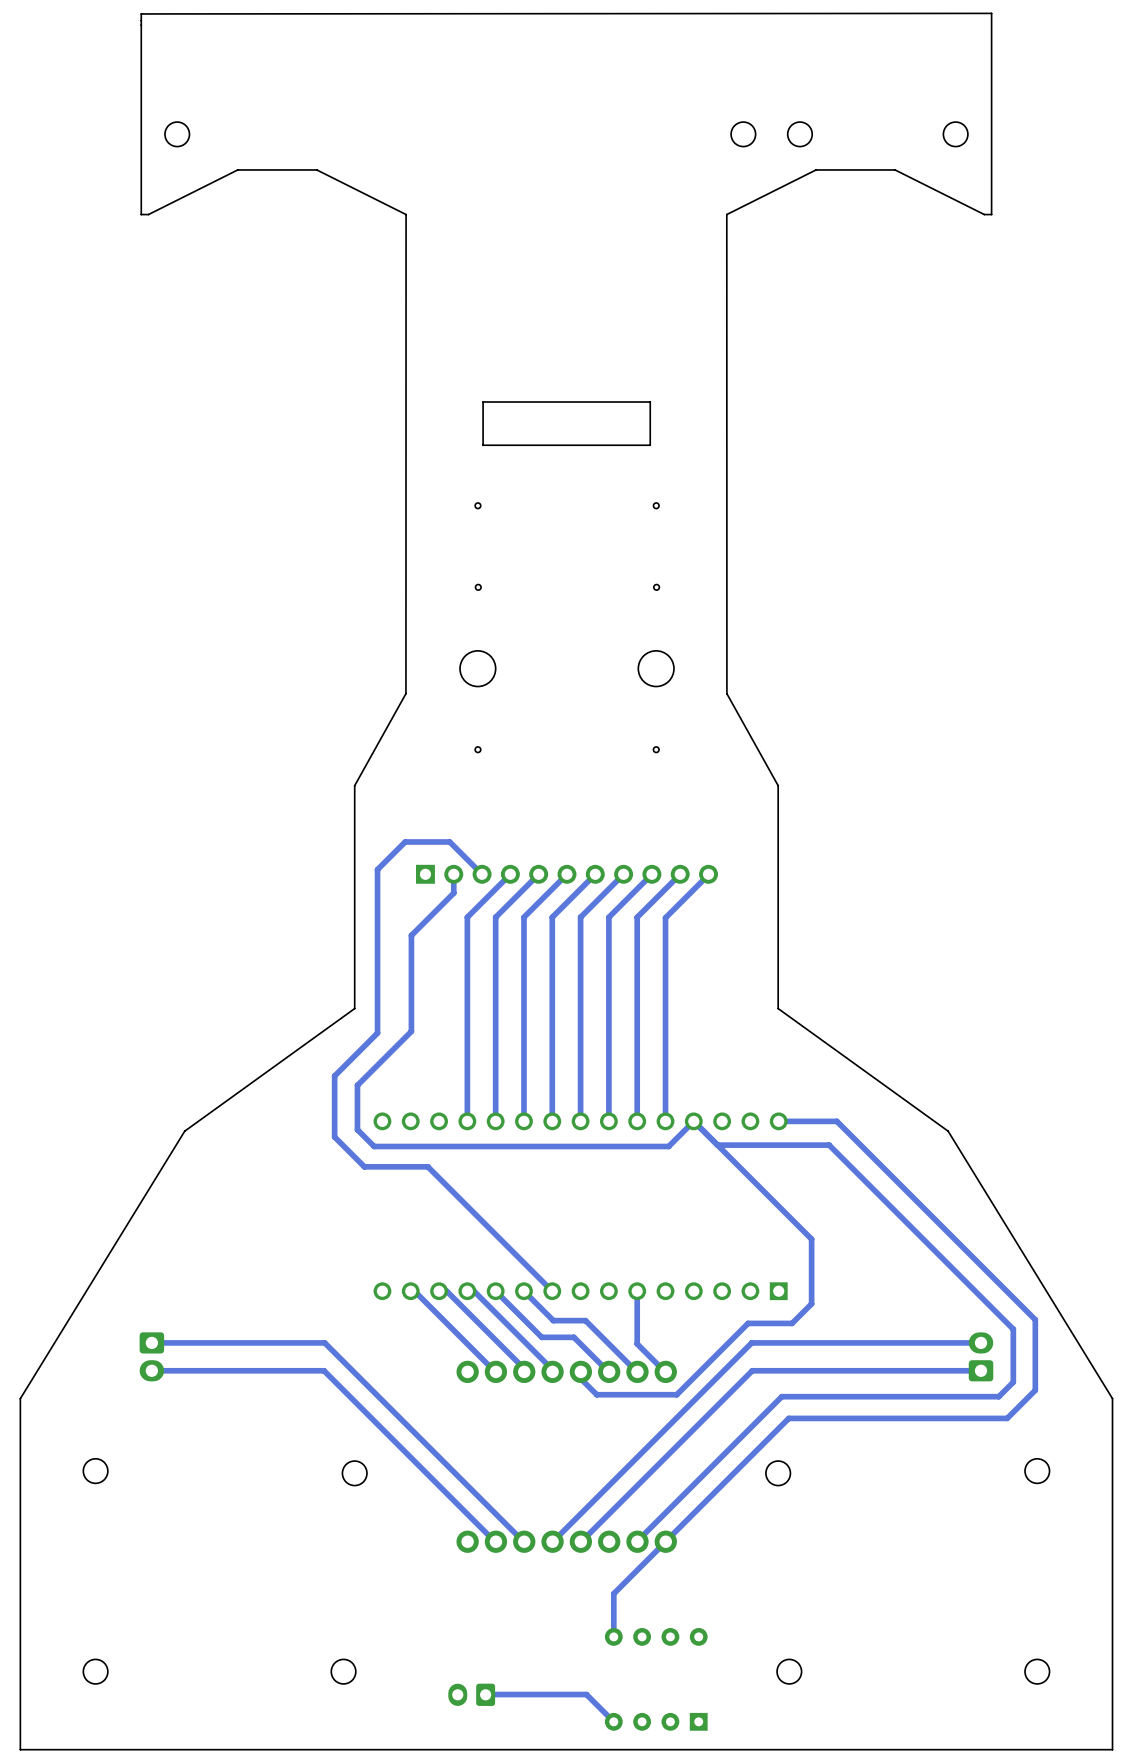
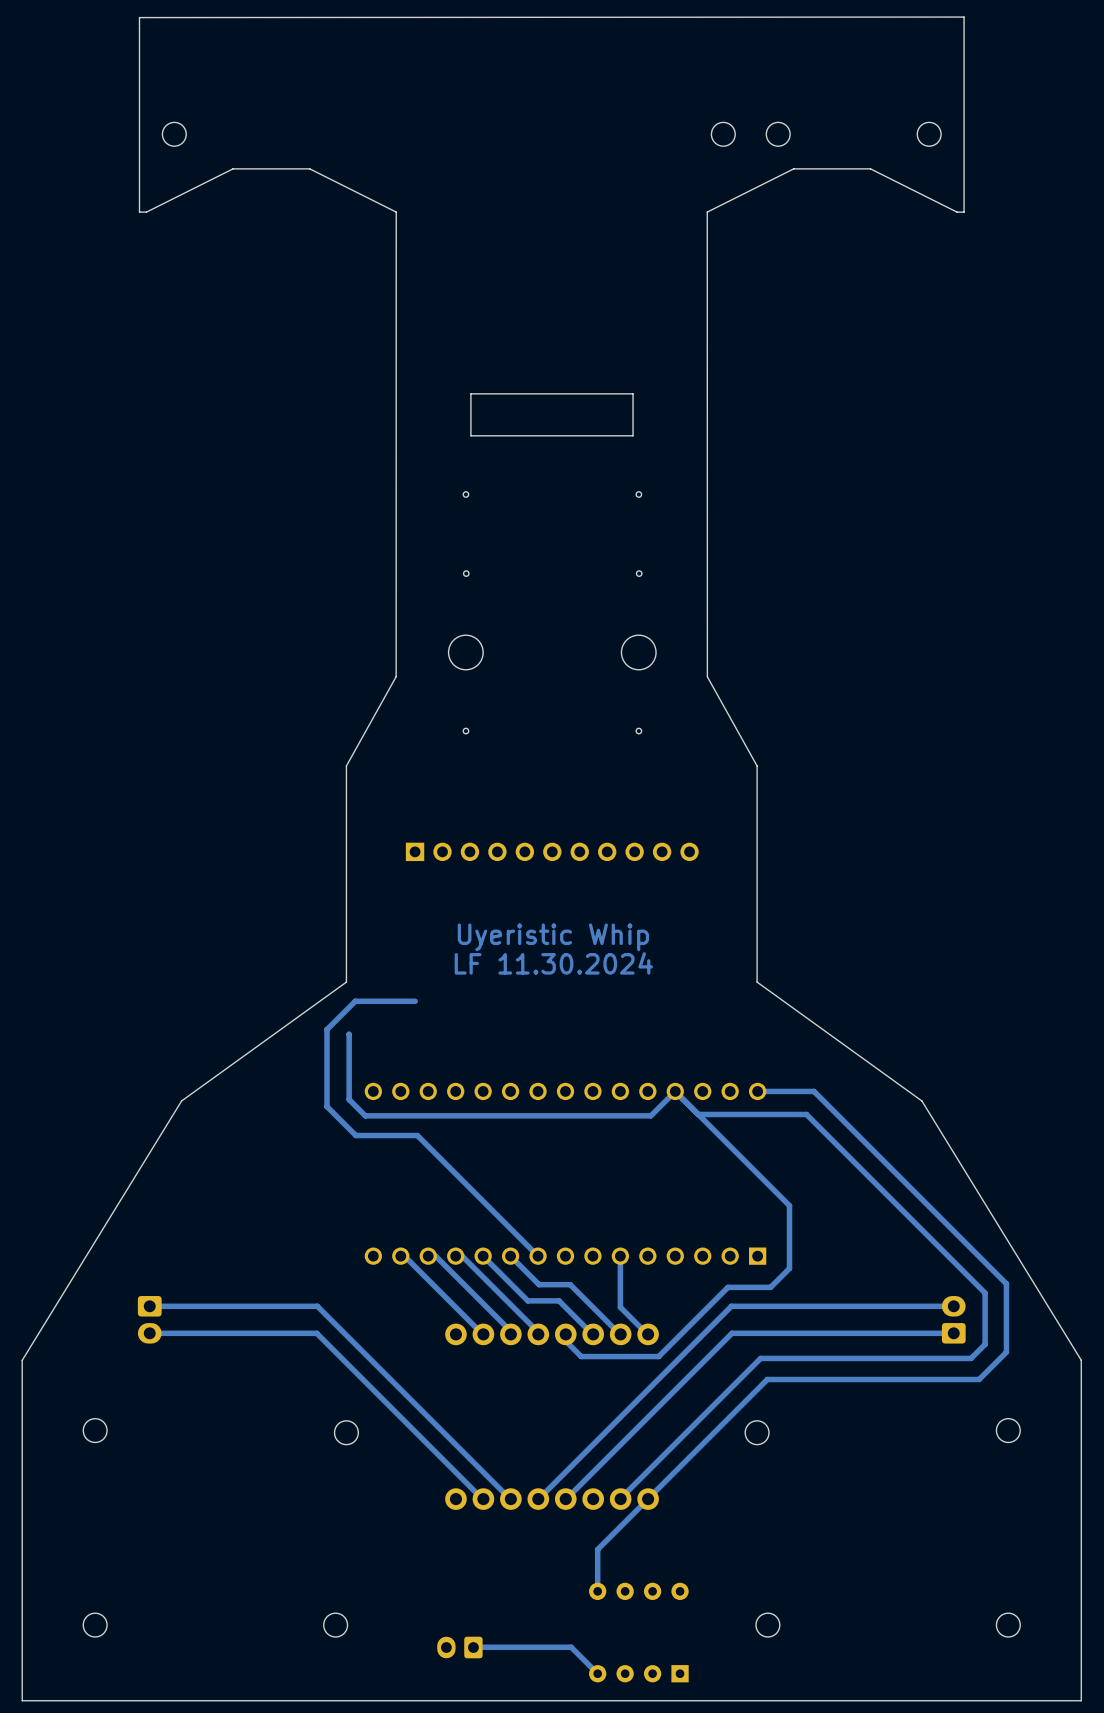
bottom track: (453, 874) (453, 893) (411, 935) (411, 1031) (357, 1085) -> (348, 1034) (349, 1056)
bottom track: (482, 874) (449, 841) (405, 841) (377, 869) (377, 1033) (334, 1076) -> (415, 1001) (355, 1001) (326, 1029) (326, 1047)
bottom track: (510, 874) (467, 917) (467, 1121) -> none
bottom track: (538, 874) (495, 917) (495, 1121) -> none
bottom track: (566, 874) (523, 917) (523, 1121) -> none
bottom track: (595, 874) (552, 917) (552, 1121) -> none
bottom track: (623, 874) (580, 917) (580, 1121) -> none
bottom track: (651, 874) (608, 917) (608, 1121) -> none
bottom track: (680, 874) (637, 917) (637, 1121) -> none
bottom track: (708, 874) (665, 917) (665, 1121) -> none
text: none -> Uyeristic Whip (553, 937)
text: none -> LF 11.30.2024 (553, 963)

